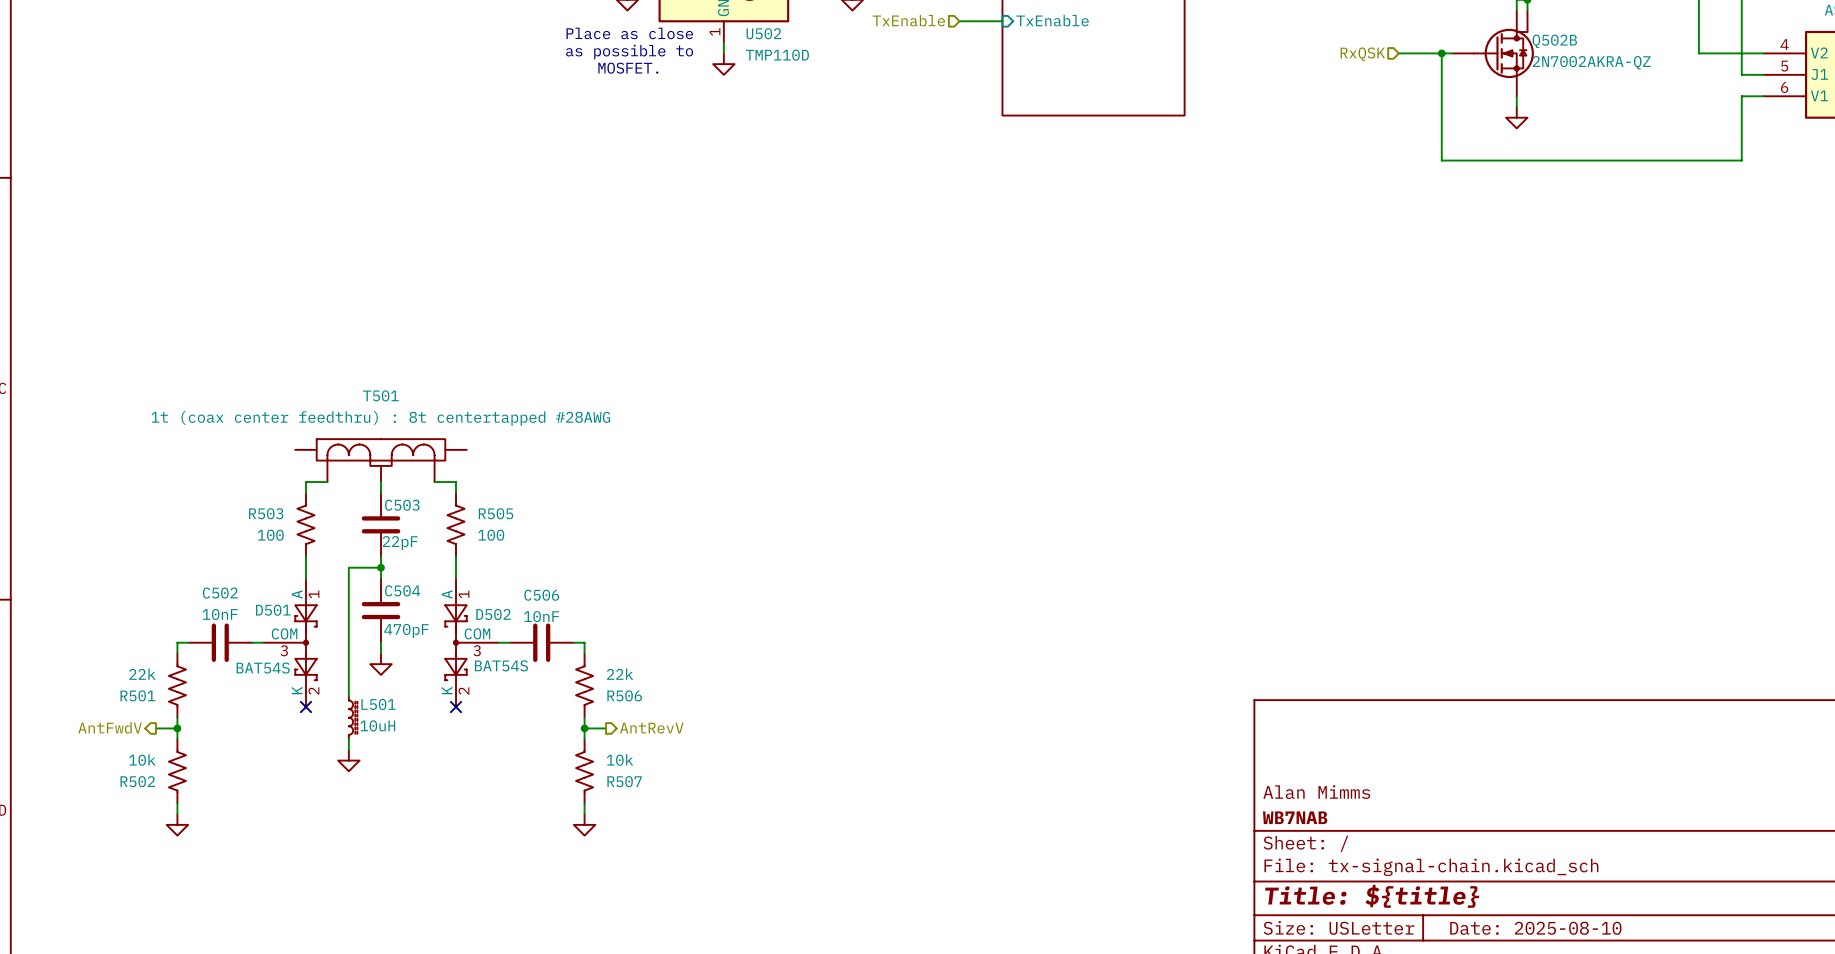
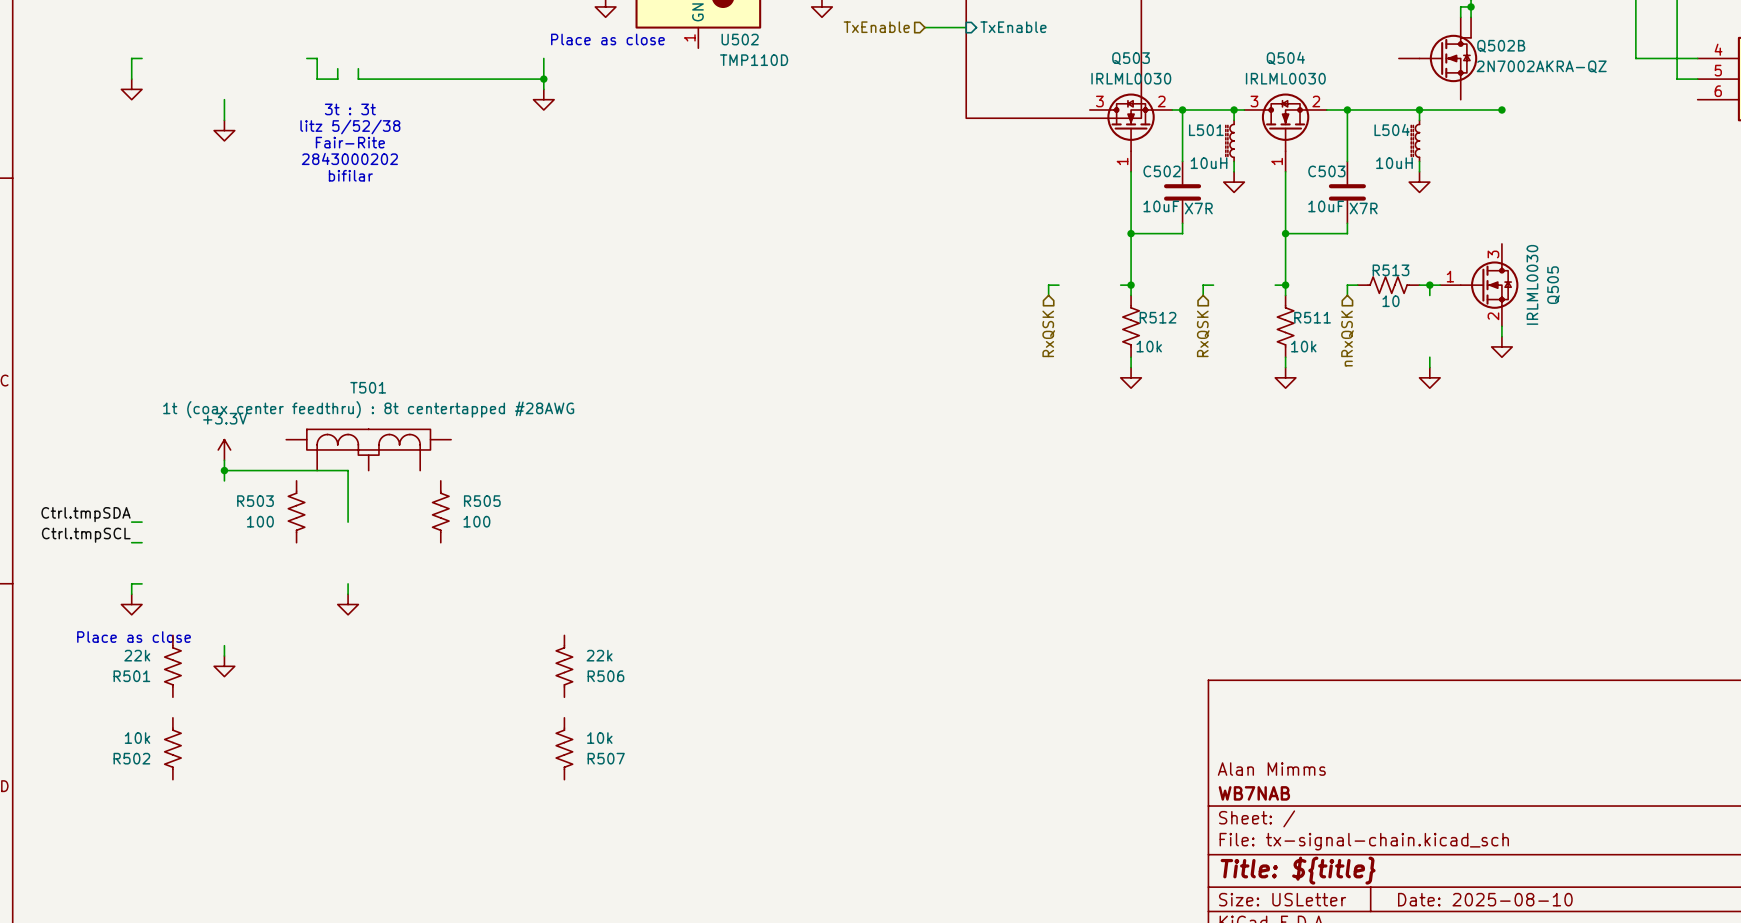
wire: (723, 42) (723, 53) -> none
text: as possible to (629, 52) -> none
wire: none -> (142, 58) (131, 58) (131, 79)
wire: none -> (306, 58) (317, 58) (317, 79) (337, 79) (337, 68)
wire: none -> (543, 58) (543, 89)
wire: (1398, 53) (1452, 53) -> none
wire: (1441, 53) (1441, 160) (1741, 160) (1741, 96) (1763, 96) -> none
junction: (1441, 53) -> none
hierarchical label: RxQSK (1362, 54) -> none
wire: none -> (358, 68) (358, 79) (543, 79)
power symbol: (723, 64) -> none
text: MOSFET. (628, 68) -> none
junction: none -> (543, 79)
power symbol: none -> (131, 89)
wire: none -> (224, 99) (224, 120)
power symbol: none -> (543, 99)
wire: (1516, 96) (1516, 106) -> (1419, 109) (1419, 120)
text: none -> 3t : 3t (350, 109)
wire: none -> (1172, 109) (1244, 109)
wire: none -> (1182, 109) (1182, 161)
junction: none -> (1182, 109)
wire: none -> (1234, 109) (1234, 120)
junction: none -> (1234, 109)
wire: none -> (1326, 109) (1501, 109)
wire: none -> (1347, 109) (1347, 161)
junction: none -> (1347, 109)
junction: none -> (1419, 109)
junction: none -> (1501, 109)
power symbol position: (1516, 117) -> (1419, 182)
text: none -> litz 5/52/38 (350, 127)
power symbol: none -> (224, 130)
Q503: none -> IRLML0030 (1131, 132)
Q504: none -> IRLML0030 (1285, 132)
L504: none -> 10uH (1415, 140)
text: none -> Fair-Rite (350, 142)
text: none -> 2843000202 (349, 158)
wire: none -> (1234, 161) (1234, 171)
wire: none -> (1419, 161) (1419, 171)
wire: none -> (1131, 171) (1131, 295)
wire: none -> (1285, 171) (1285, 295)
text: none -> bifilar (350, 175)
power symbol: none -> (1234, 182)
C502 text: none -> X7R (1198, 208)
C503 text: none -> X7R (1363, 208)
wire: none -> (1182, 223) (1182, 233) (1131, 233)
wire: none -> (1347, 223) (1347, 233) (1285, 233)
junction: none -> (1131, 233)
junction: none -> (1285, 233)
wire: none -> (1058, 285) (1048, 285) (1048, 295)
wire: none -> (1120, 285) (1131, 285)
junction: none -> (1131, 285)
wire: none -> (1213, 285) (1203, 285) (1203, 295)
wire: none -> (1275, 285) (1285, 285)
junction: none -> (1285, 285)
wire: none -> (1357, 285) (1347, 285) (1347, 295)
R513: none -> 10 (1388, 285)
wire: none -> (1419, 285) (1440, 285)
wire: none -> (1429, 285) (1429, 295)
junction: none -> (1429, 285)
Q505: none -> IRLML0030 (1479, 285)
R512: none -> 10k (1131, 326)
R511: none -> 10k (1285, 326)
wire: none -> (1501, 326) (1501, 336)
hierarchical label: none -> RxQSK (1048, 333)
hierarchical label: none -> RxQSK (1203, 333)
hierarchical label: none -> nRxQSK (1347, 338)
power symbol: none -> (1501, 346)
wire: none -> (1131, 357) (1131, 367)
wire: none -> (1285, 357) (1285, 367)
wire: none -> (1429, 357) (1429, 367)
power symbol: none -> (1131, 377)
power symbol: none -> (1285, 377)
power symbol: none -> (1429, 377)
power symbol: none -> +3.3V (224, 449)
junction: none -> (224, 470)
wire: (306, 482) (306, 492) -> (296, 470) (224, 470)
wire: none -> (317, 470) (348, 470) (348, 522)
wire: (381, 482) (381, 492) -> none
wire: (434, 482) (456, 482) (456, 492) -> none
C503 name position: C503 (402, 505) -> C503 (1326, 171)
C503 position: (381, 524) -> (1347, 192)
label: none -> Ctrl.tmpSDA (86, 514)
wire: none -> (131, 522) (142, 522)
C503 value: 22pF (400, 543) -> 10uF (1326, 206)
label: none -> Ctrl.tmpSCL (86, 535)
wire: (306, 557) (306, 578) -> (224, 460) (224, 480)
wire: (381, 557) (381, 578) -> none
wire: (456, 557) (456, 578) -> none
wire: (381, 567) (348, 567) (348, 696) -> none
junction: (381, 567) -> none
C502 name position: C502 (220, 593) -> C502 (1162, 171)
C504: 470pF (381, 610) -> none
C502 value: 10nF (220, 614) -> 10uF (1161, 206)
power symbol: none -> (131, 604)
wire: (188, 642) (177, 642) (177, 653) -> (142, 583) (131, 583) (131, 594)
C502 rotation: 0° (220, 642) -> 90° clockwise (1182, 192)
C502 position: (220, 642) -> (1182, 192)
wire: (252, 642) (263, 642) -> (131, 542) (142, 542)
D501: BAT54S (289, 642) -> none
wire: (381, 642) (381, 653) -> (348, 583) (348, 594)
D502: BAT54S (472, 642) -> none
wire: (498, 642) (509, 642) -> none
C506: 10nF (541, 642) -> none
wire: (573, 642) (584, 642) (584, 653) -> none
text: none -> Place as close (134, 637)
power symbol position: (381, 664) -> (348, 604)
power symbol: none -> (224, 666)
L501 name position: L501 (378, 704) -> L501 (1206, 130)
no-connect mark: (306, 707) -> none
no-connect mark: (456, 707) -> none
wire: (177, 717) (177, 739) -> none
L501 rotation: 0° (353, 717) -> 180° (1229, 140)
L501 position: (353, 717) -> (1229, 140)
wire: (584, 717) (584, 739) -> none
L501 value position: 10uH (377, 725) -> 10uH (1209, 163)
hierarchical label: AntFwdV (110, 727) -> none
wire: (155, 728) (177, 728) -> none
junction: (177, 728) -> none
wire: (584, 728) (606, 728) -> none
junction: (584, 728) -> none
hierarchical label: AntRevV (651, 728) -> none
wire: (348, 739) (348, 749) -> (224, 645) (224, 656)
power symbol: (348, 760) -> none
wire: (177, 803) (177, 814) -> none
wire: (584, 803) (584, 814) -> none
power symbol: (177, 824) -> none
power symbol: (584, 824) -> none

